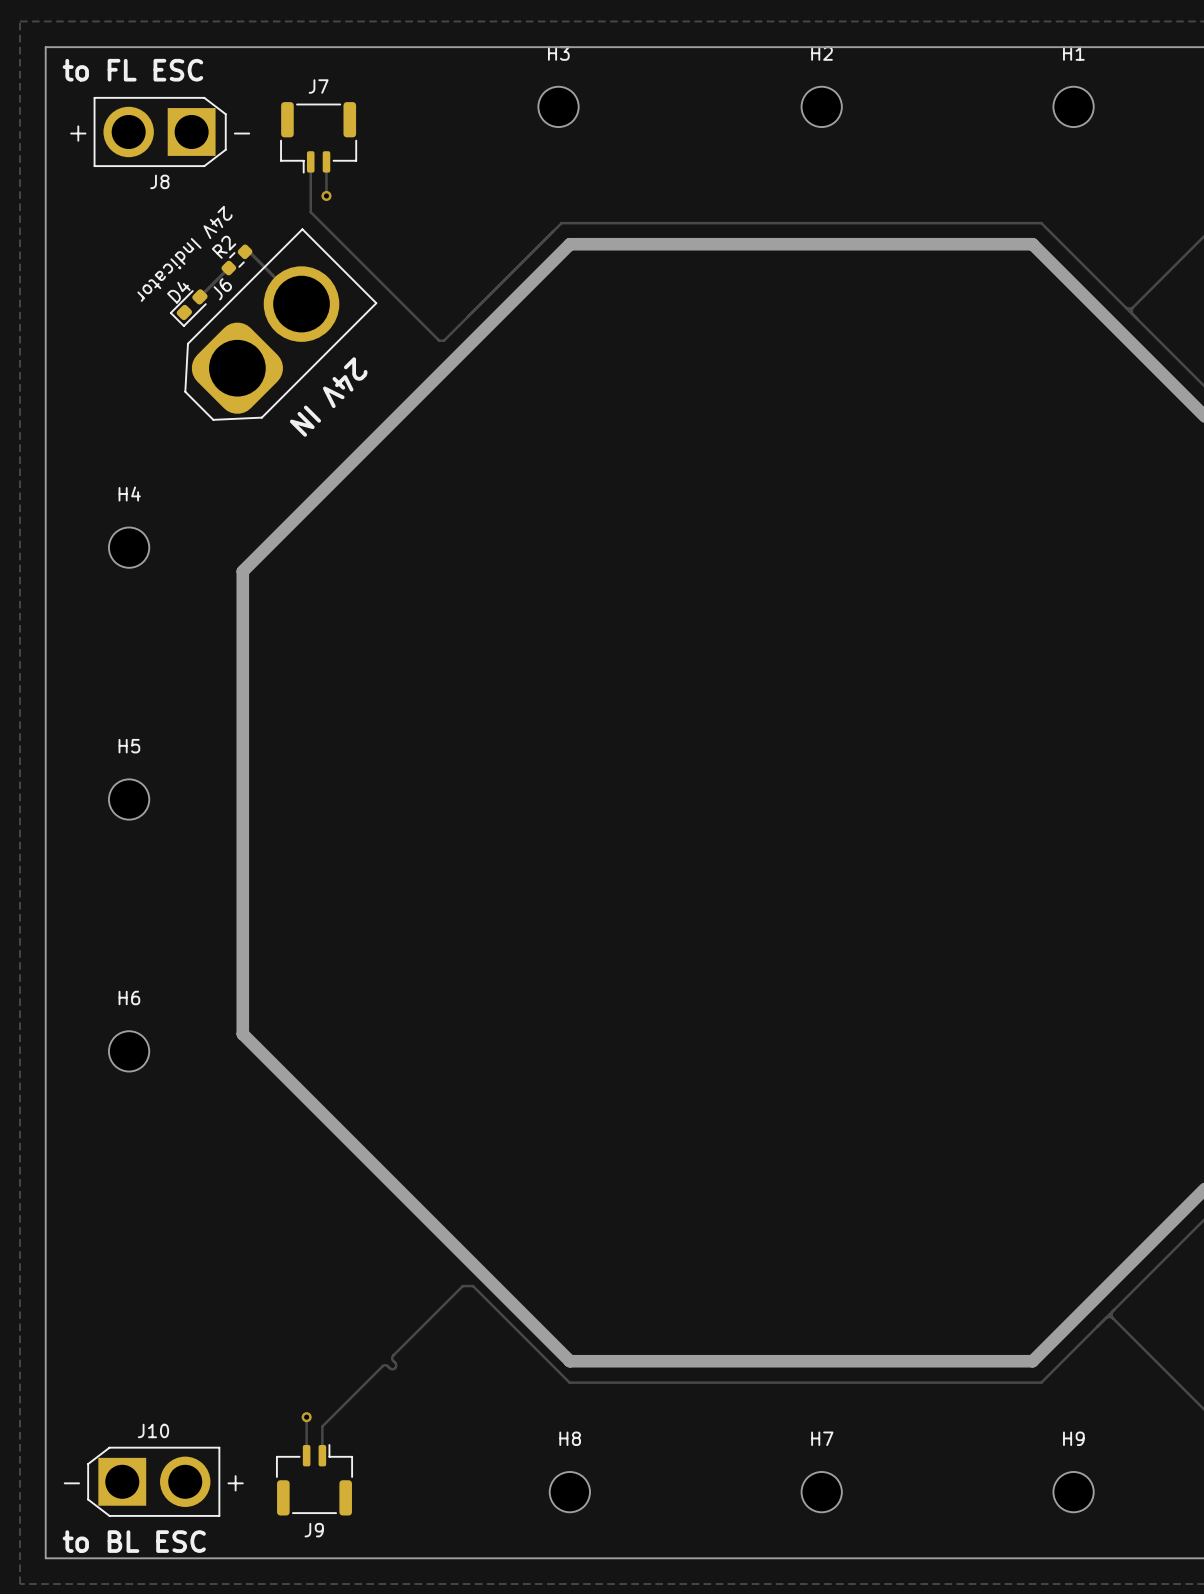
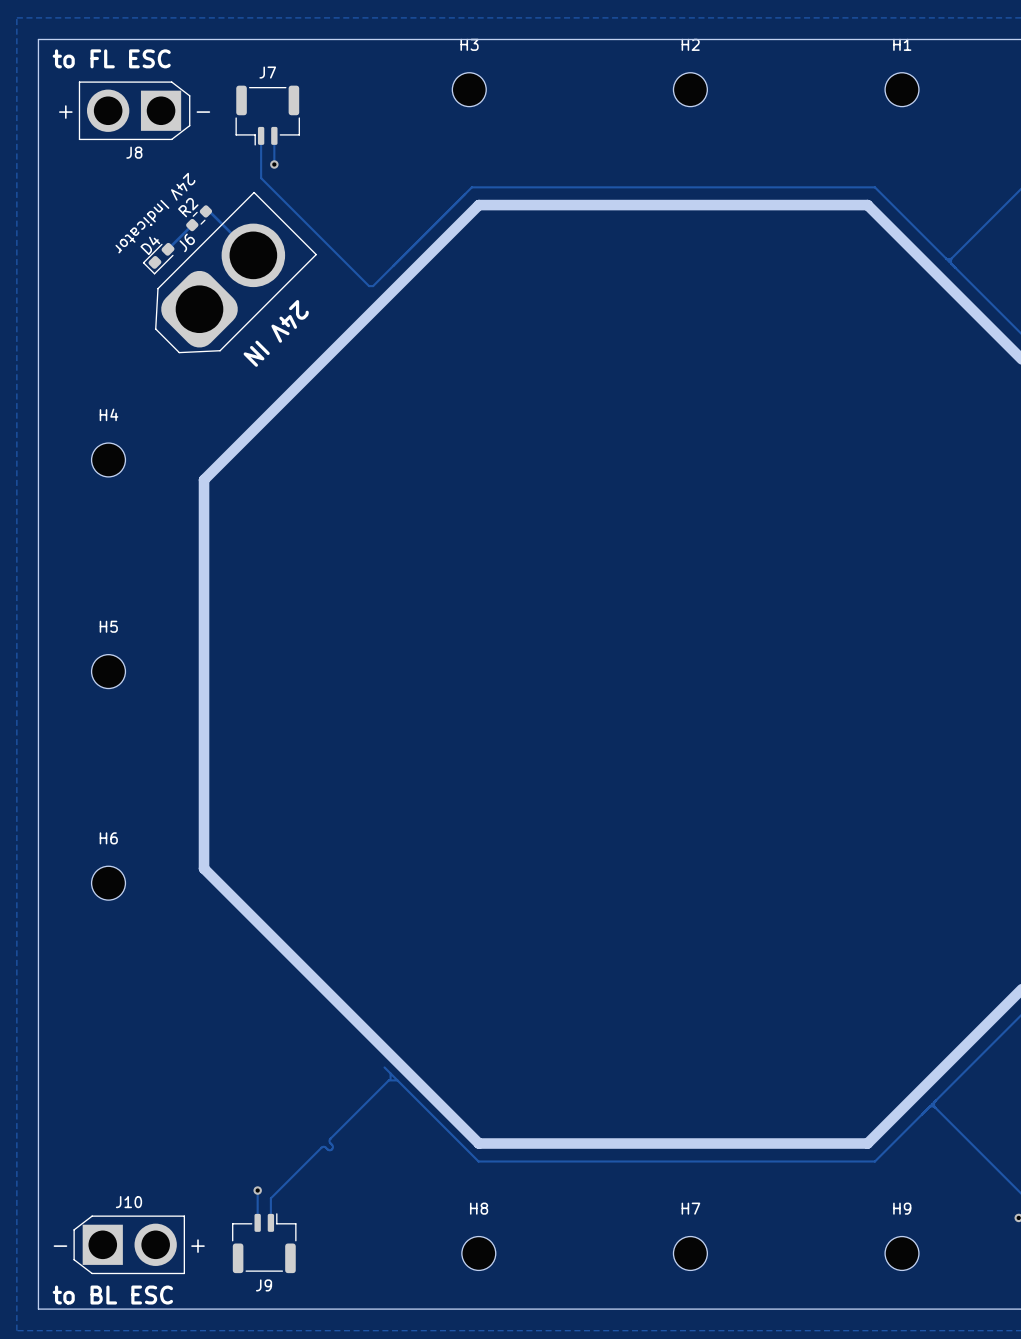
track: none -> (384, 1067) (397, 1080)
track: none -> (390, 1073) (390, 1078)

